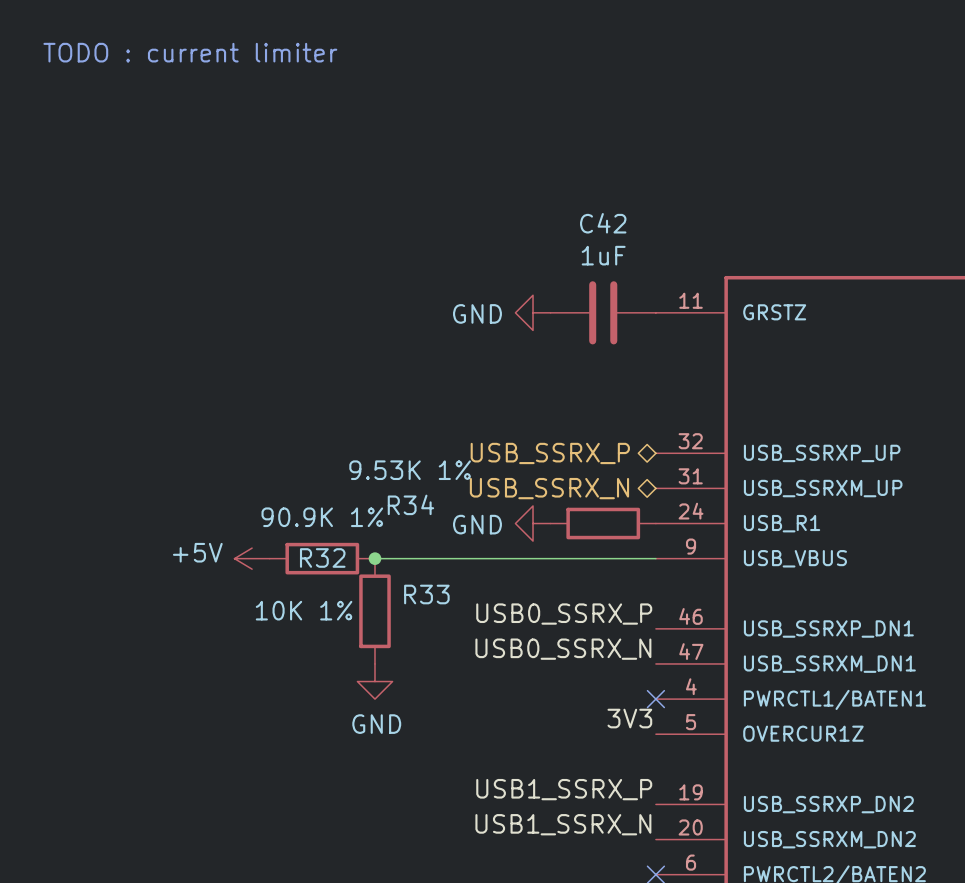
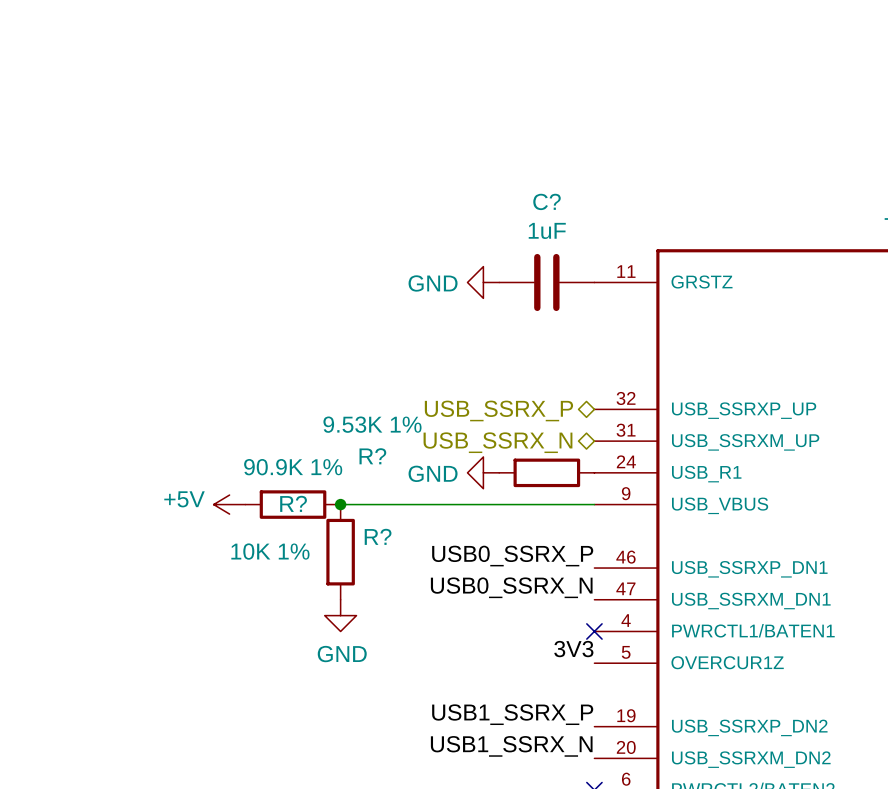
text: TODO : current limiter (190, 52) -> none
C42 name: C42 (603, 223) -> C? (547, 201)
R34 name: R34 (410, 504) -> R? (372, 456)
R32 name: R32 (322, 557) -> R? (293, 503)
R33 name: R33 (426, 594) -> R? (378, 536)

